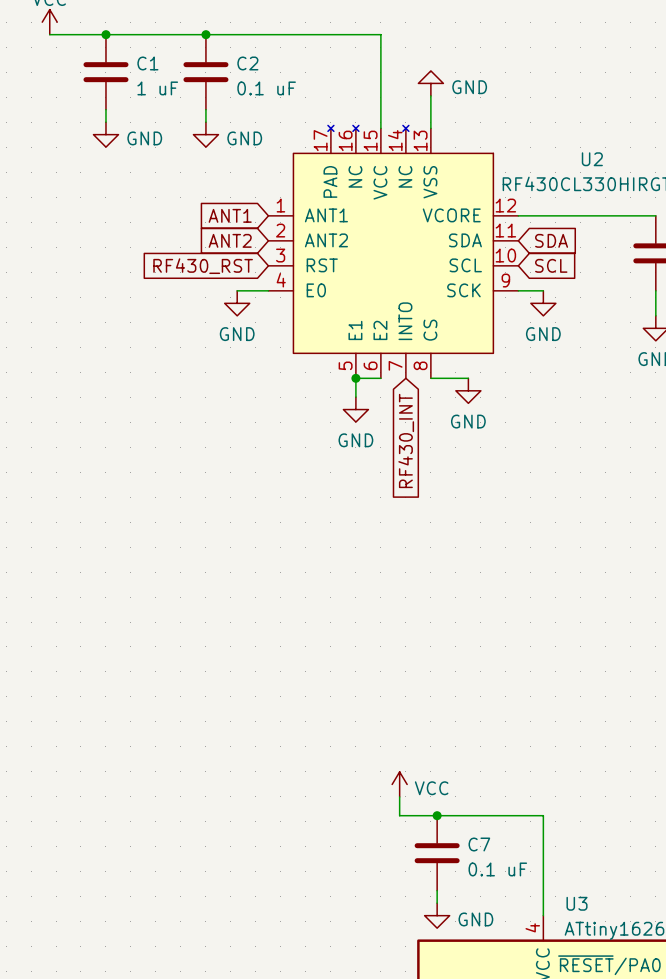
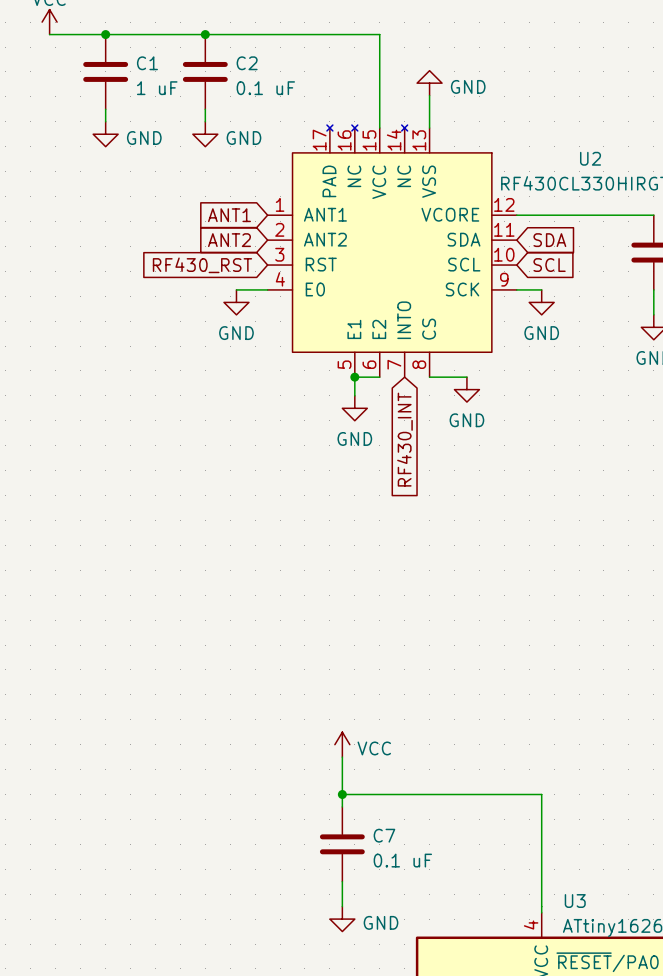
wire: none -> (342, 757) (342, 806)
power symbol position: VCC (399, 784) -> VCC (342, 744)
junction: none -> (342, 794)
wire: (399, 796) (399, 815) (543, 815) -> (342, 794) (541, 794) (541, 813)
junction: (437, 815) -> none
C7 position: (437, 853) -> (342, 844)
wire: none -> (342, 881) (342, 906)
wire: (437, 890) (437, 903) -> none
power symbol position: GND (437, 915) -> GND (342, 919)

